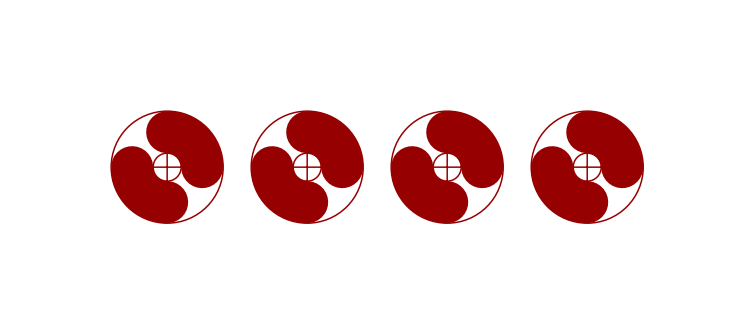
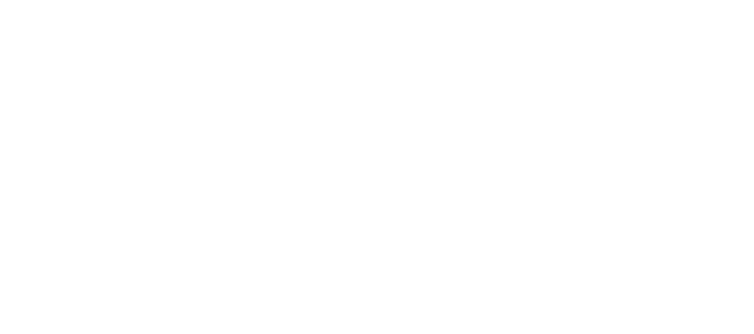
part: (167, 167) -> none
part: (307, 167) -> none
part: (447, 167) -> none
part: (587, 167) -> none

